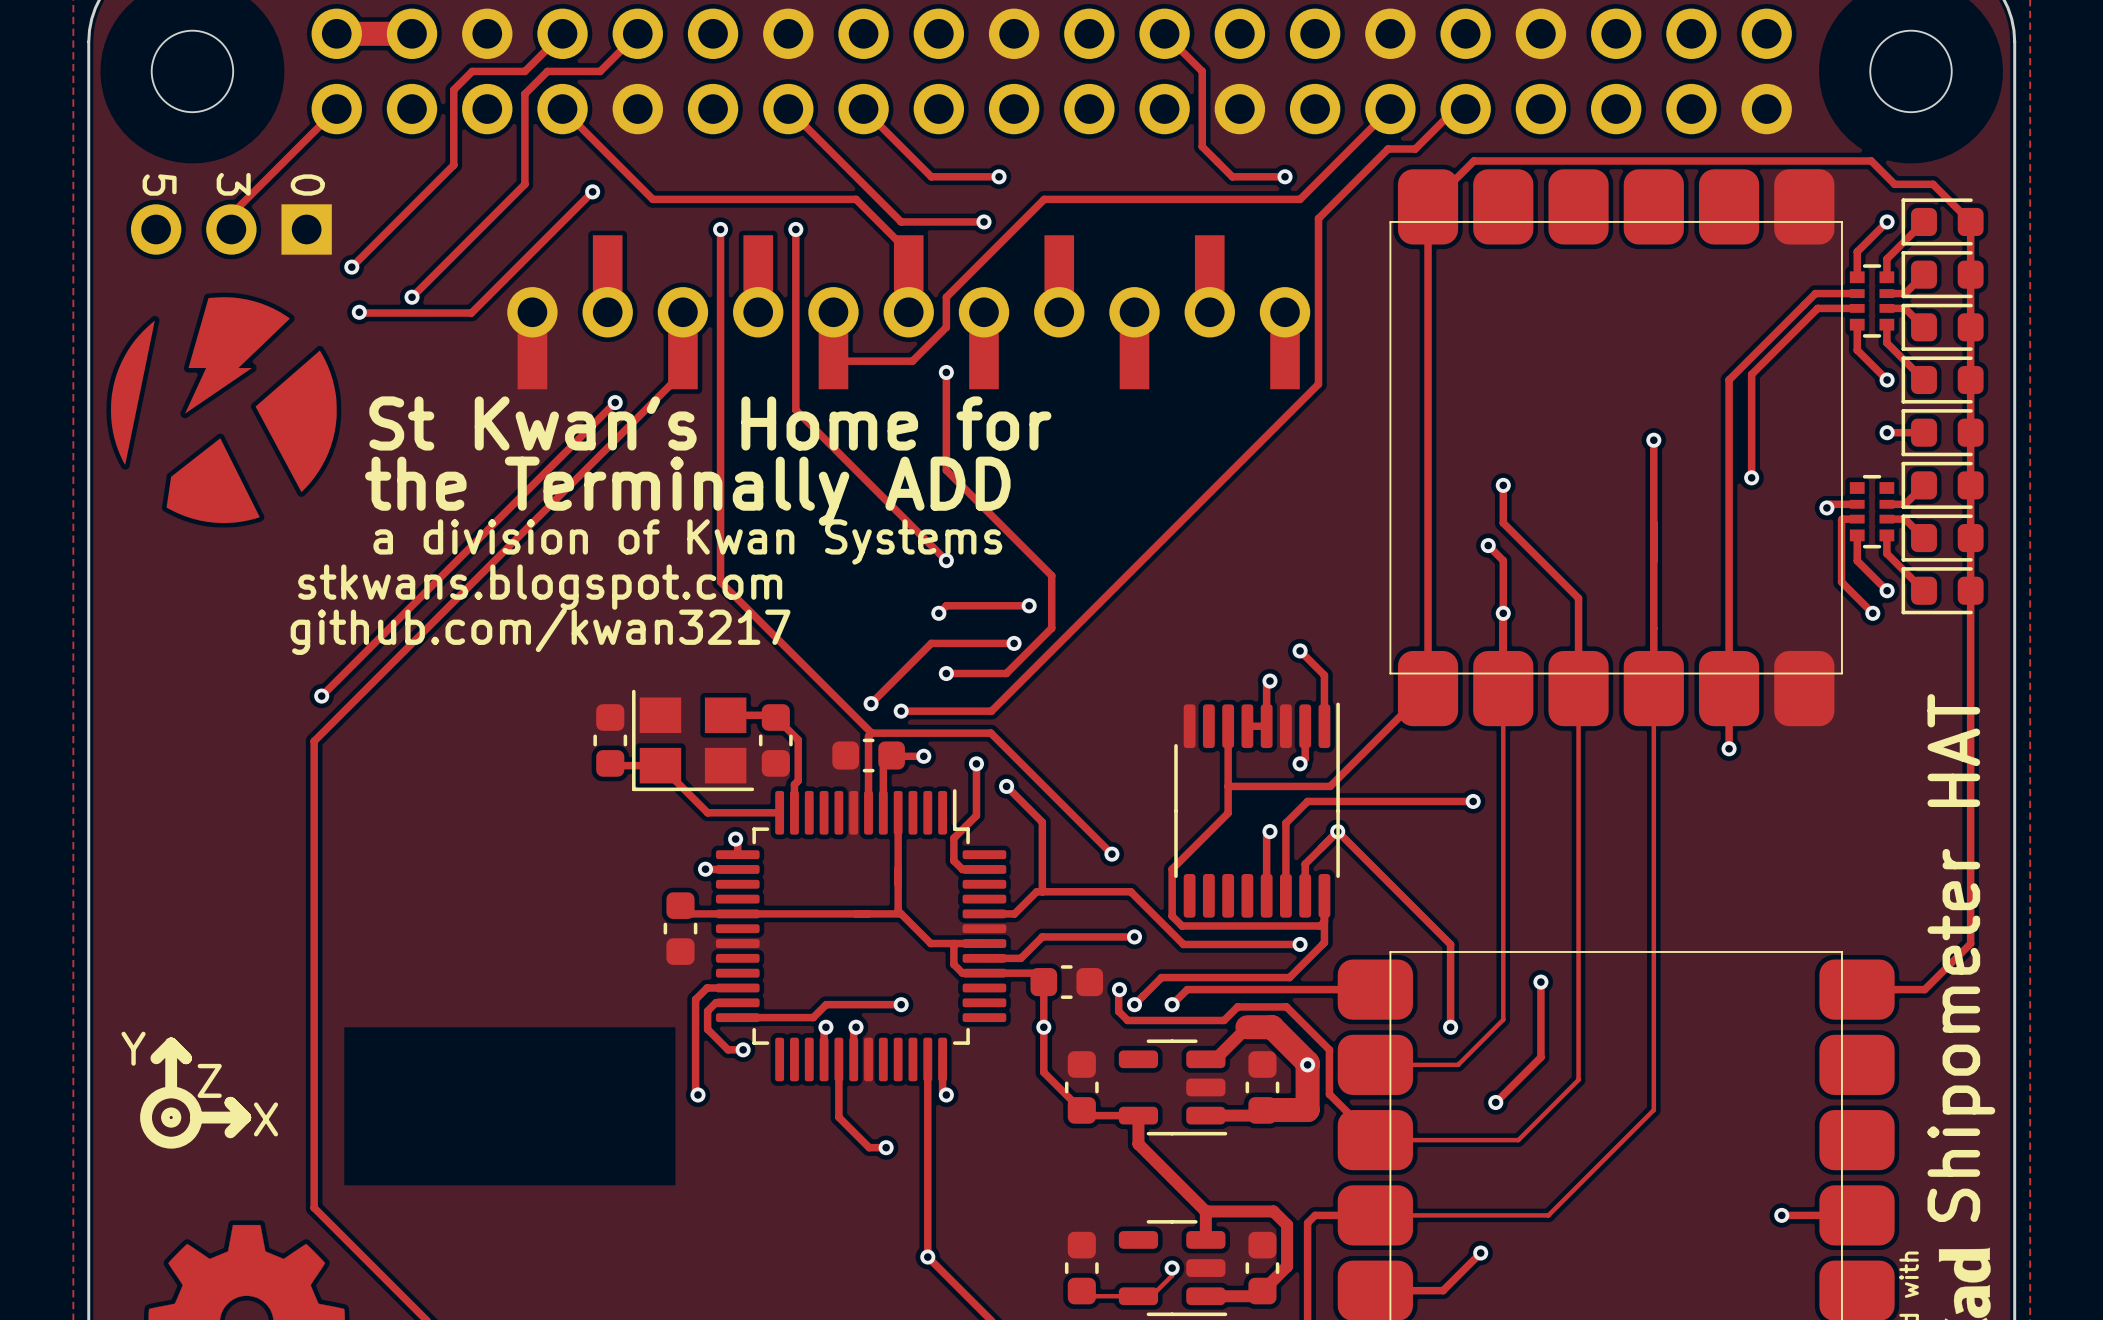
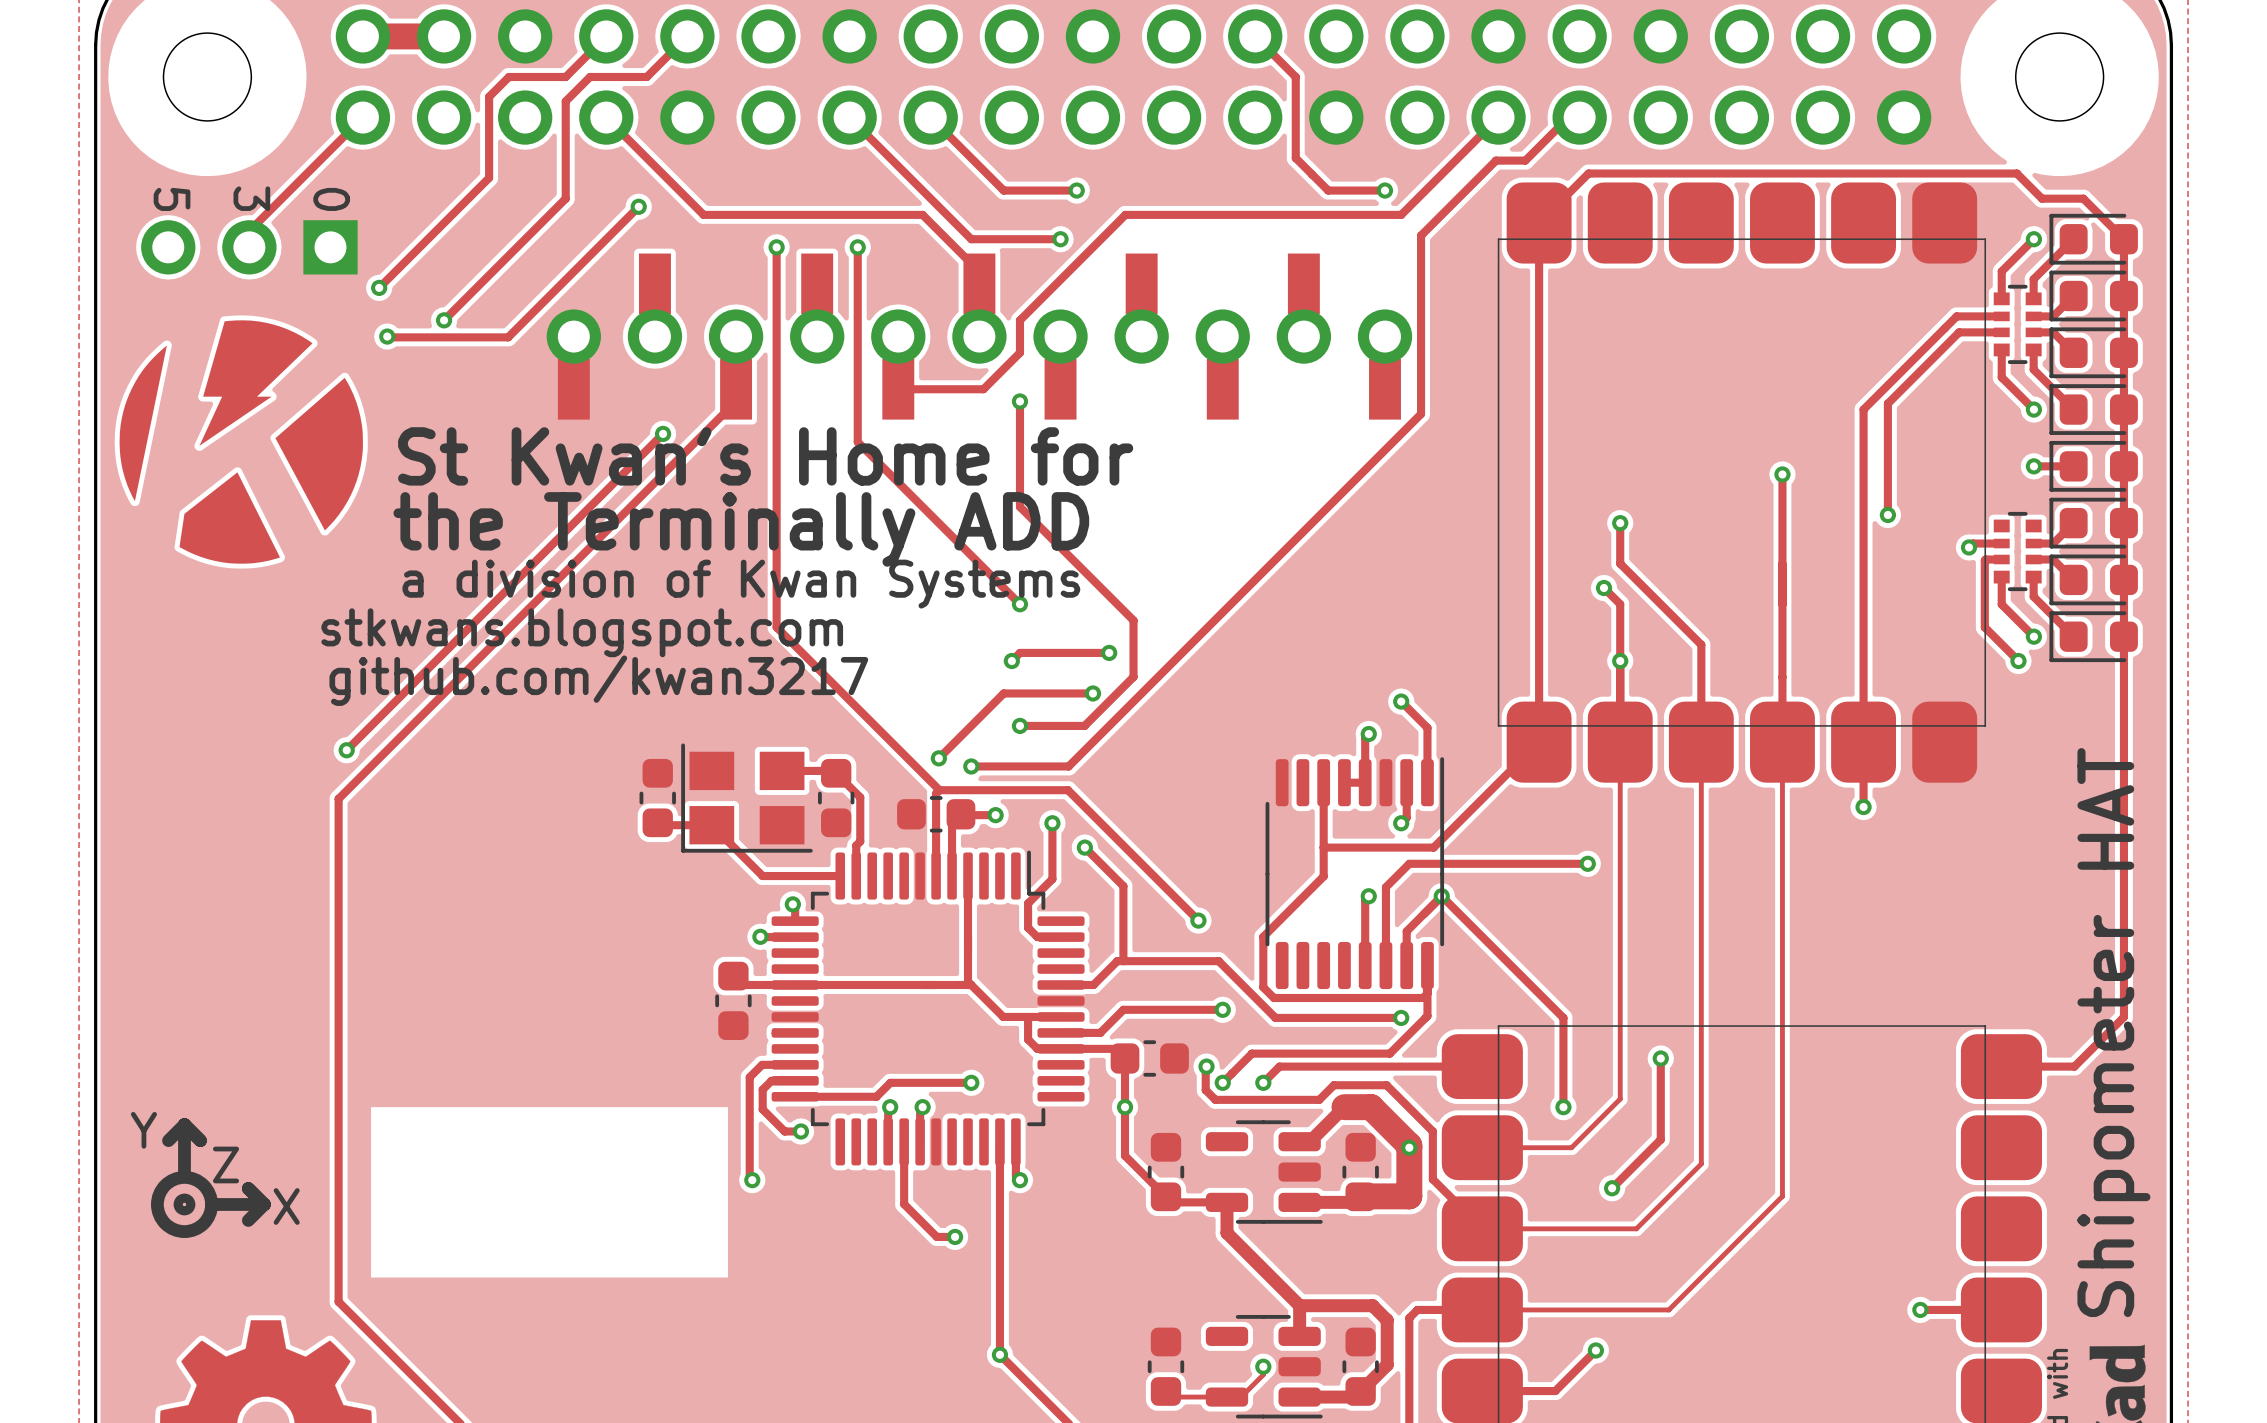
drawing shape: [110, 297, 1052, 655] -> [119, 320, 1134, 706]

